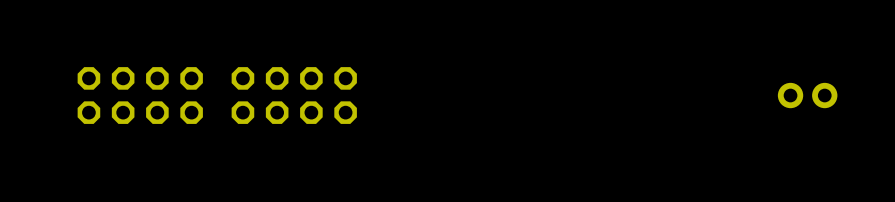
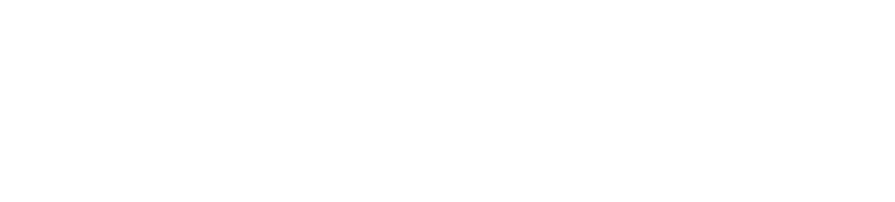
part: (140, 95) -> none
part: (294, 95) -> none
part: (807, 95) -> none

